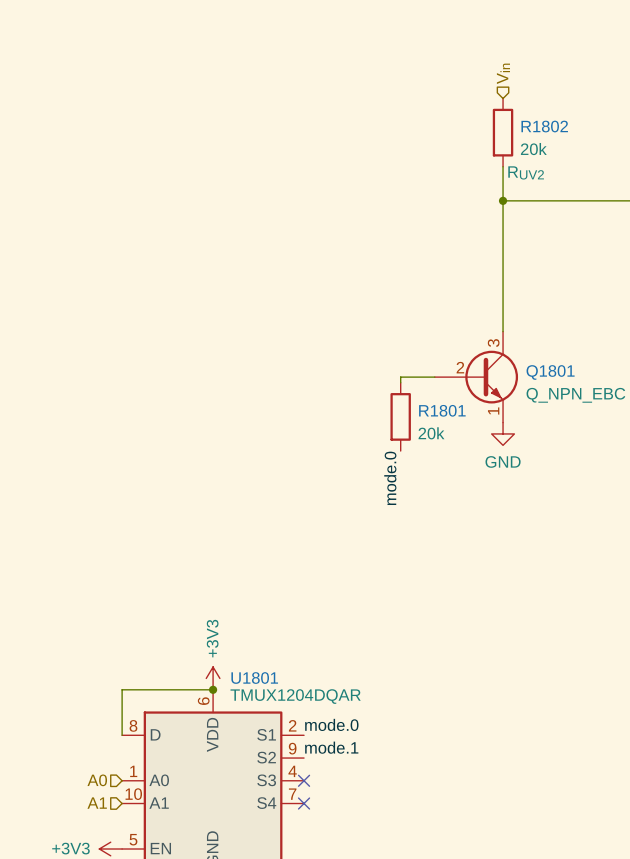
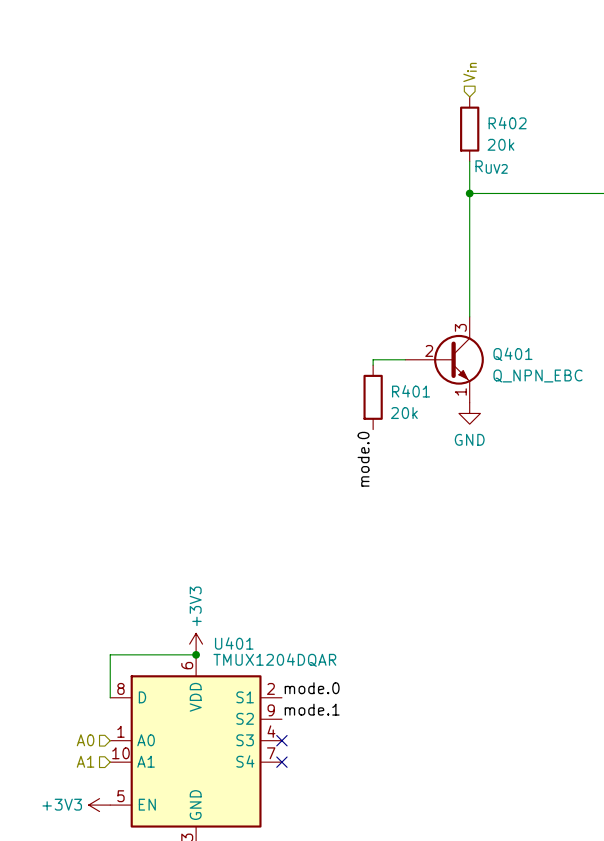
R1802 name: R1802 (544, 126) -> R402 (507, 123)
Q1801 name: Q1801 (550, 372) -> Q401 (512, 354)
R1801 name: R1801 (442, 410) -> R401 (411, 391)
U1801 name: U1801 (254, 678) -> U401 (234, 643)

